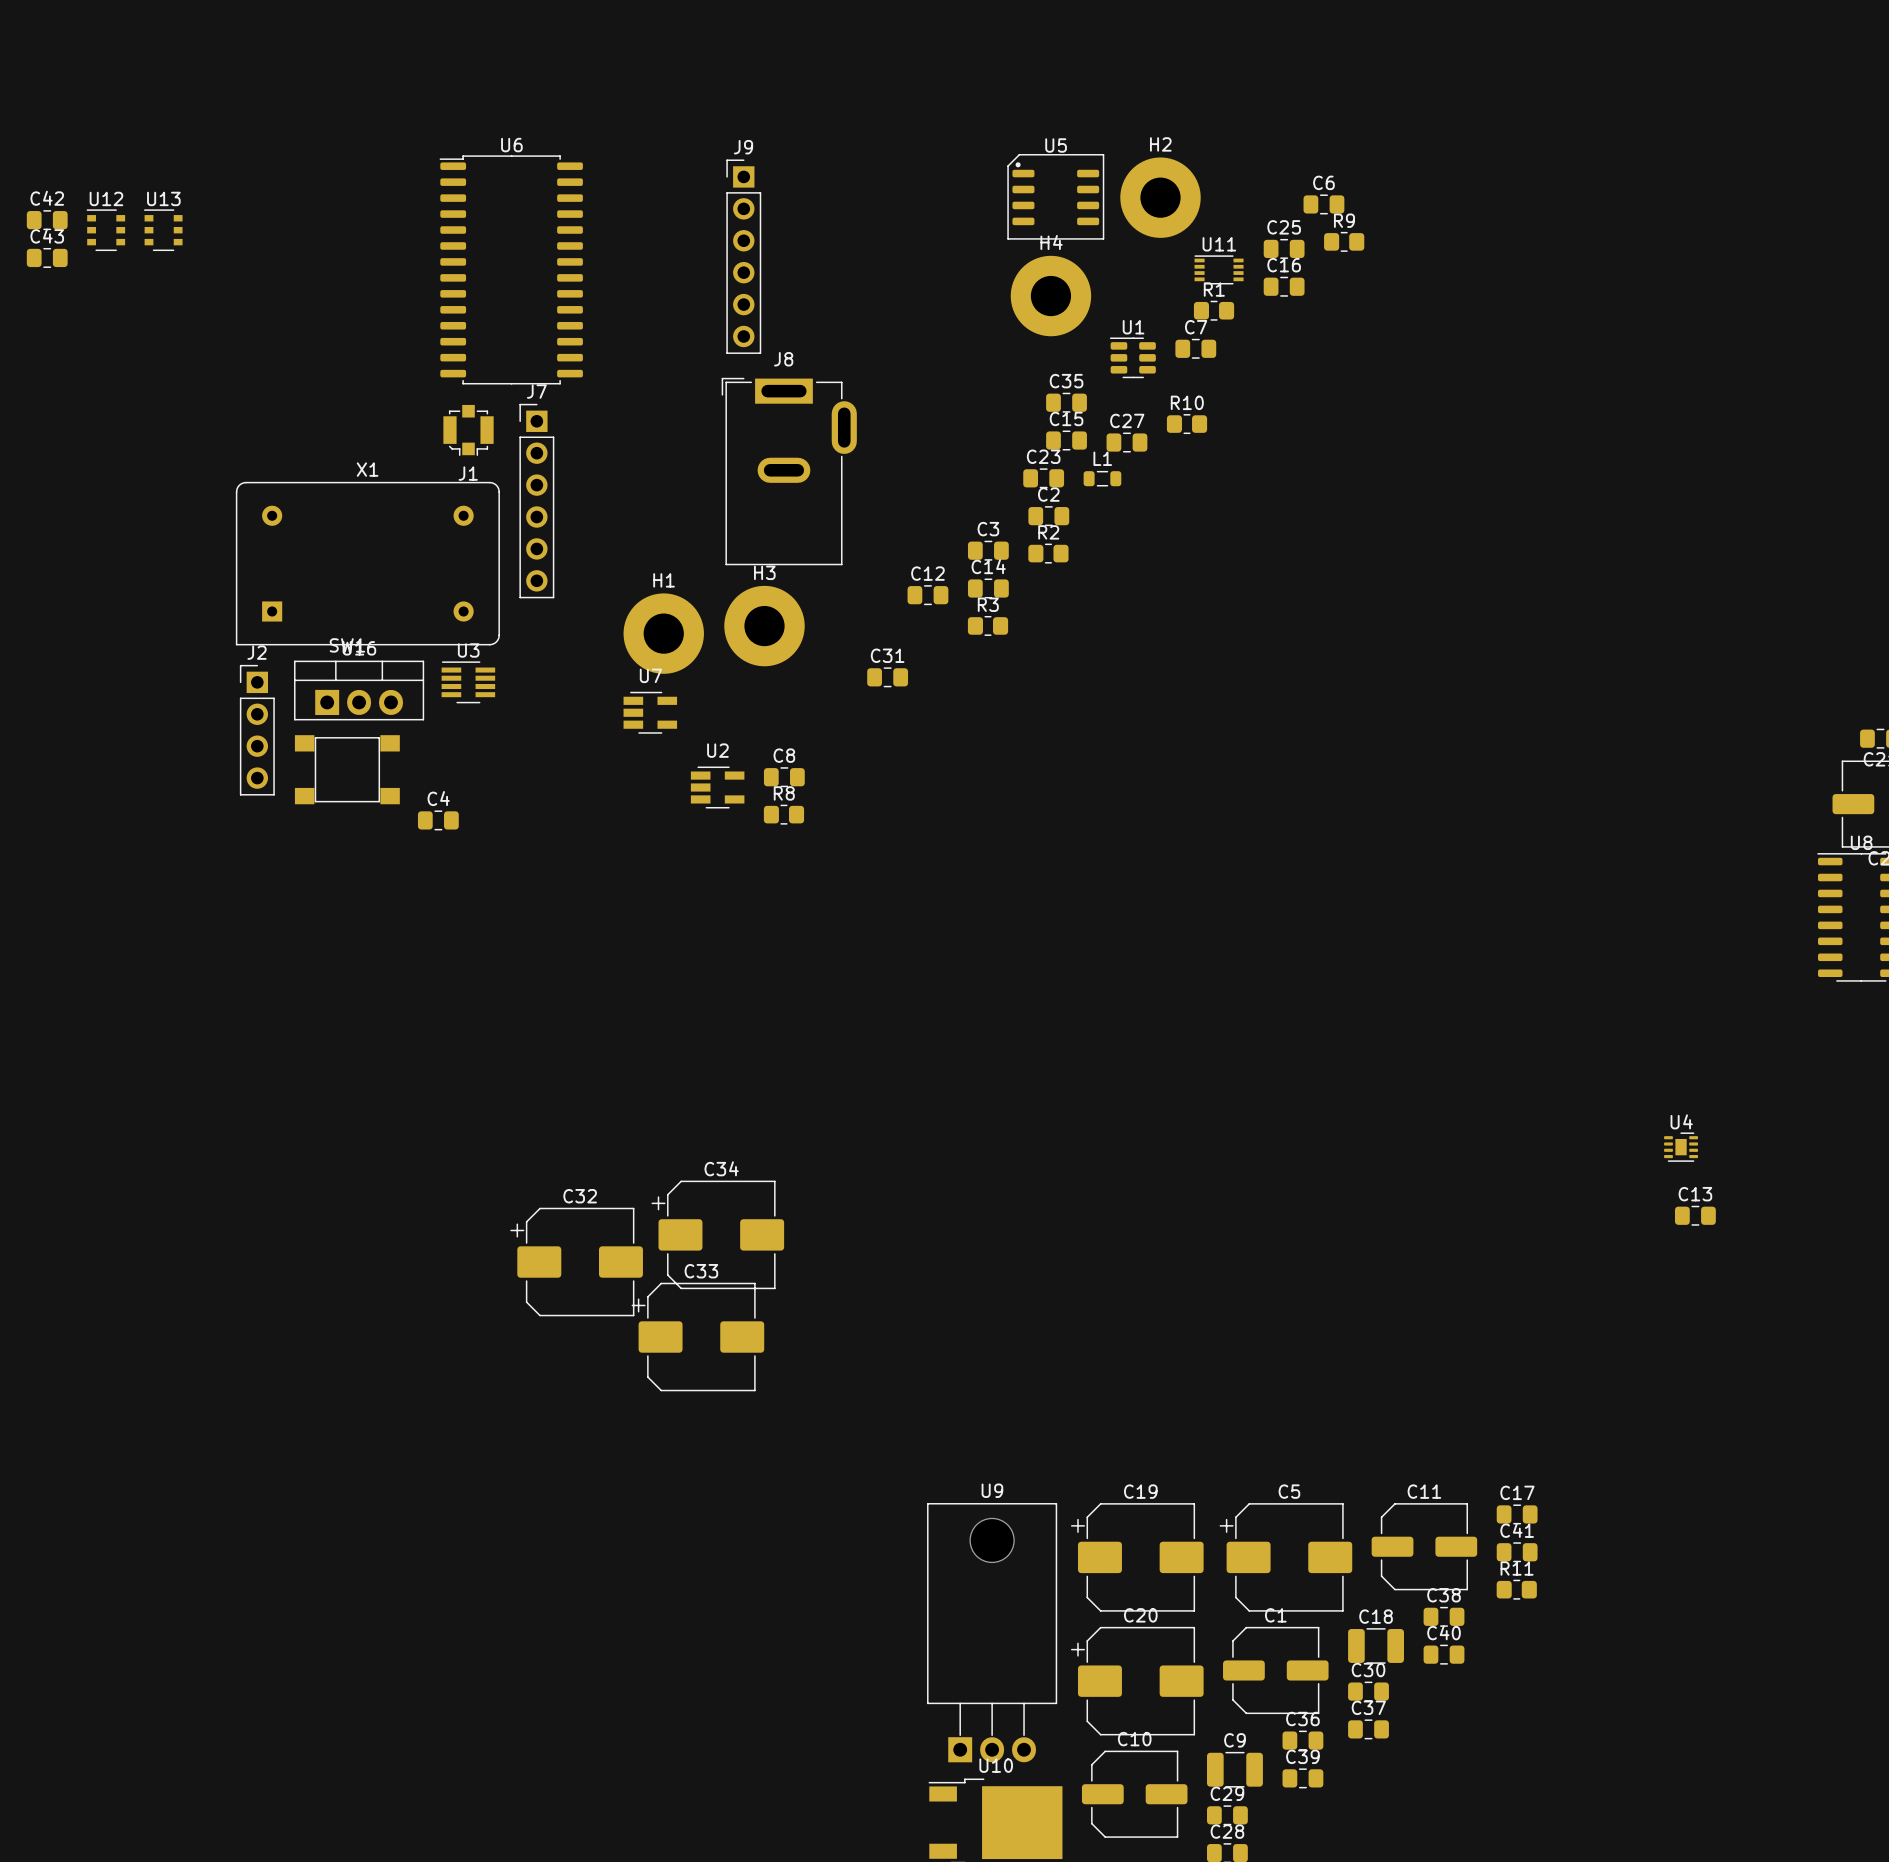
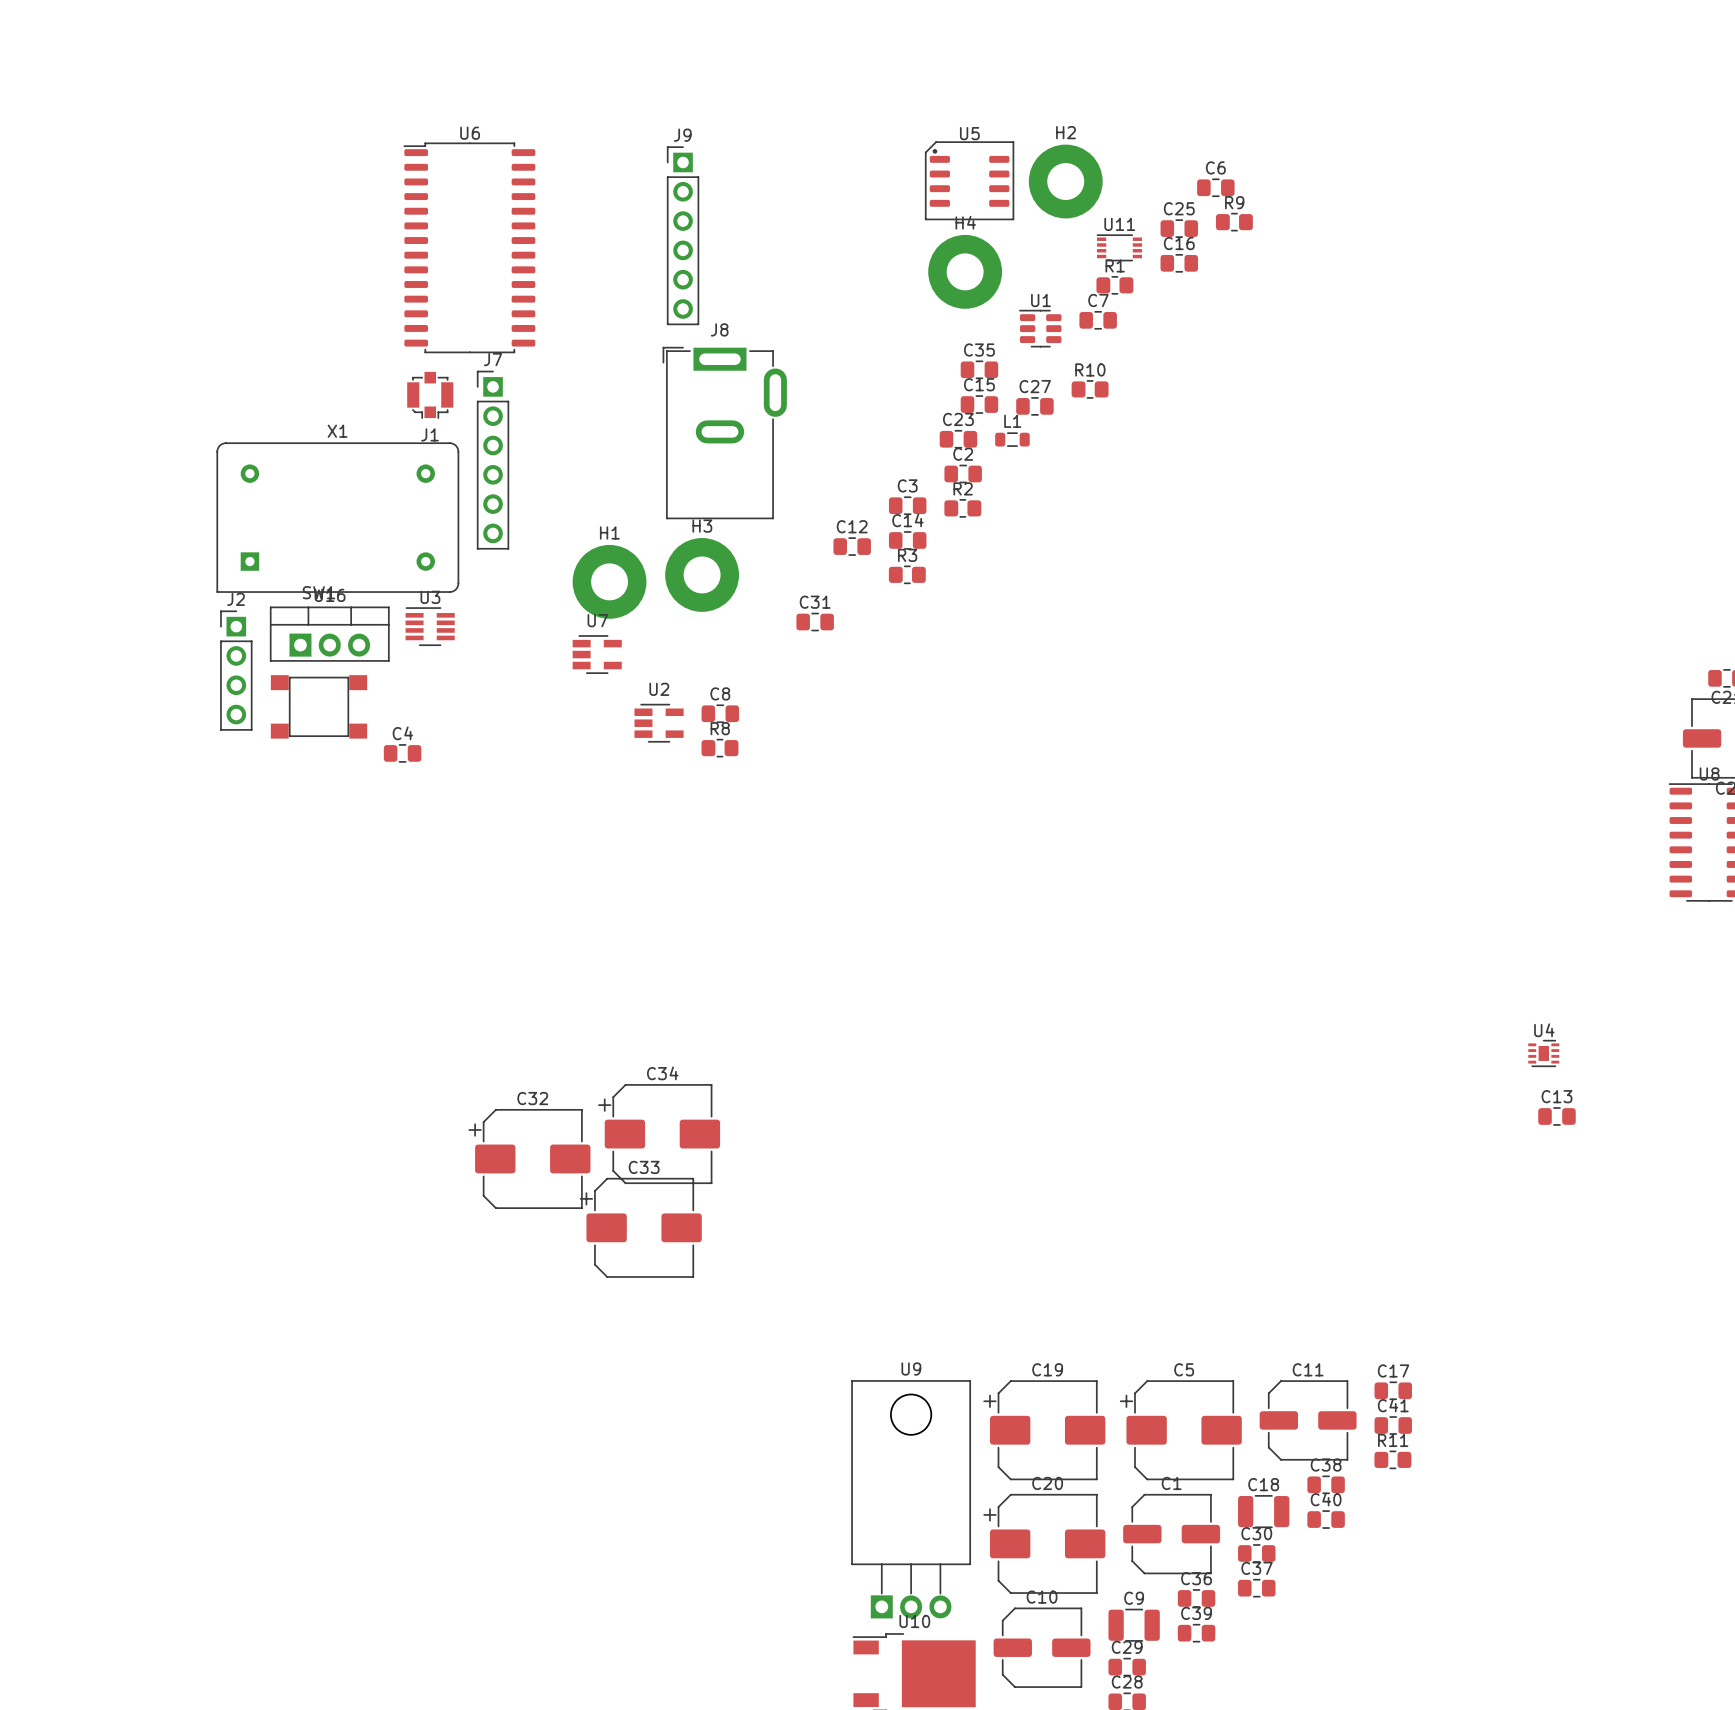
C42: (47, 220) -> none
U12: (105, 230) -> none
U13: (163, 230) -> none
C43: (47, 257) -> none

